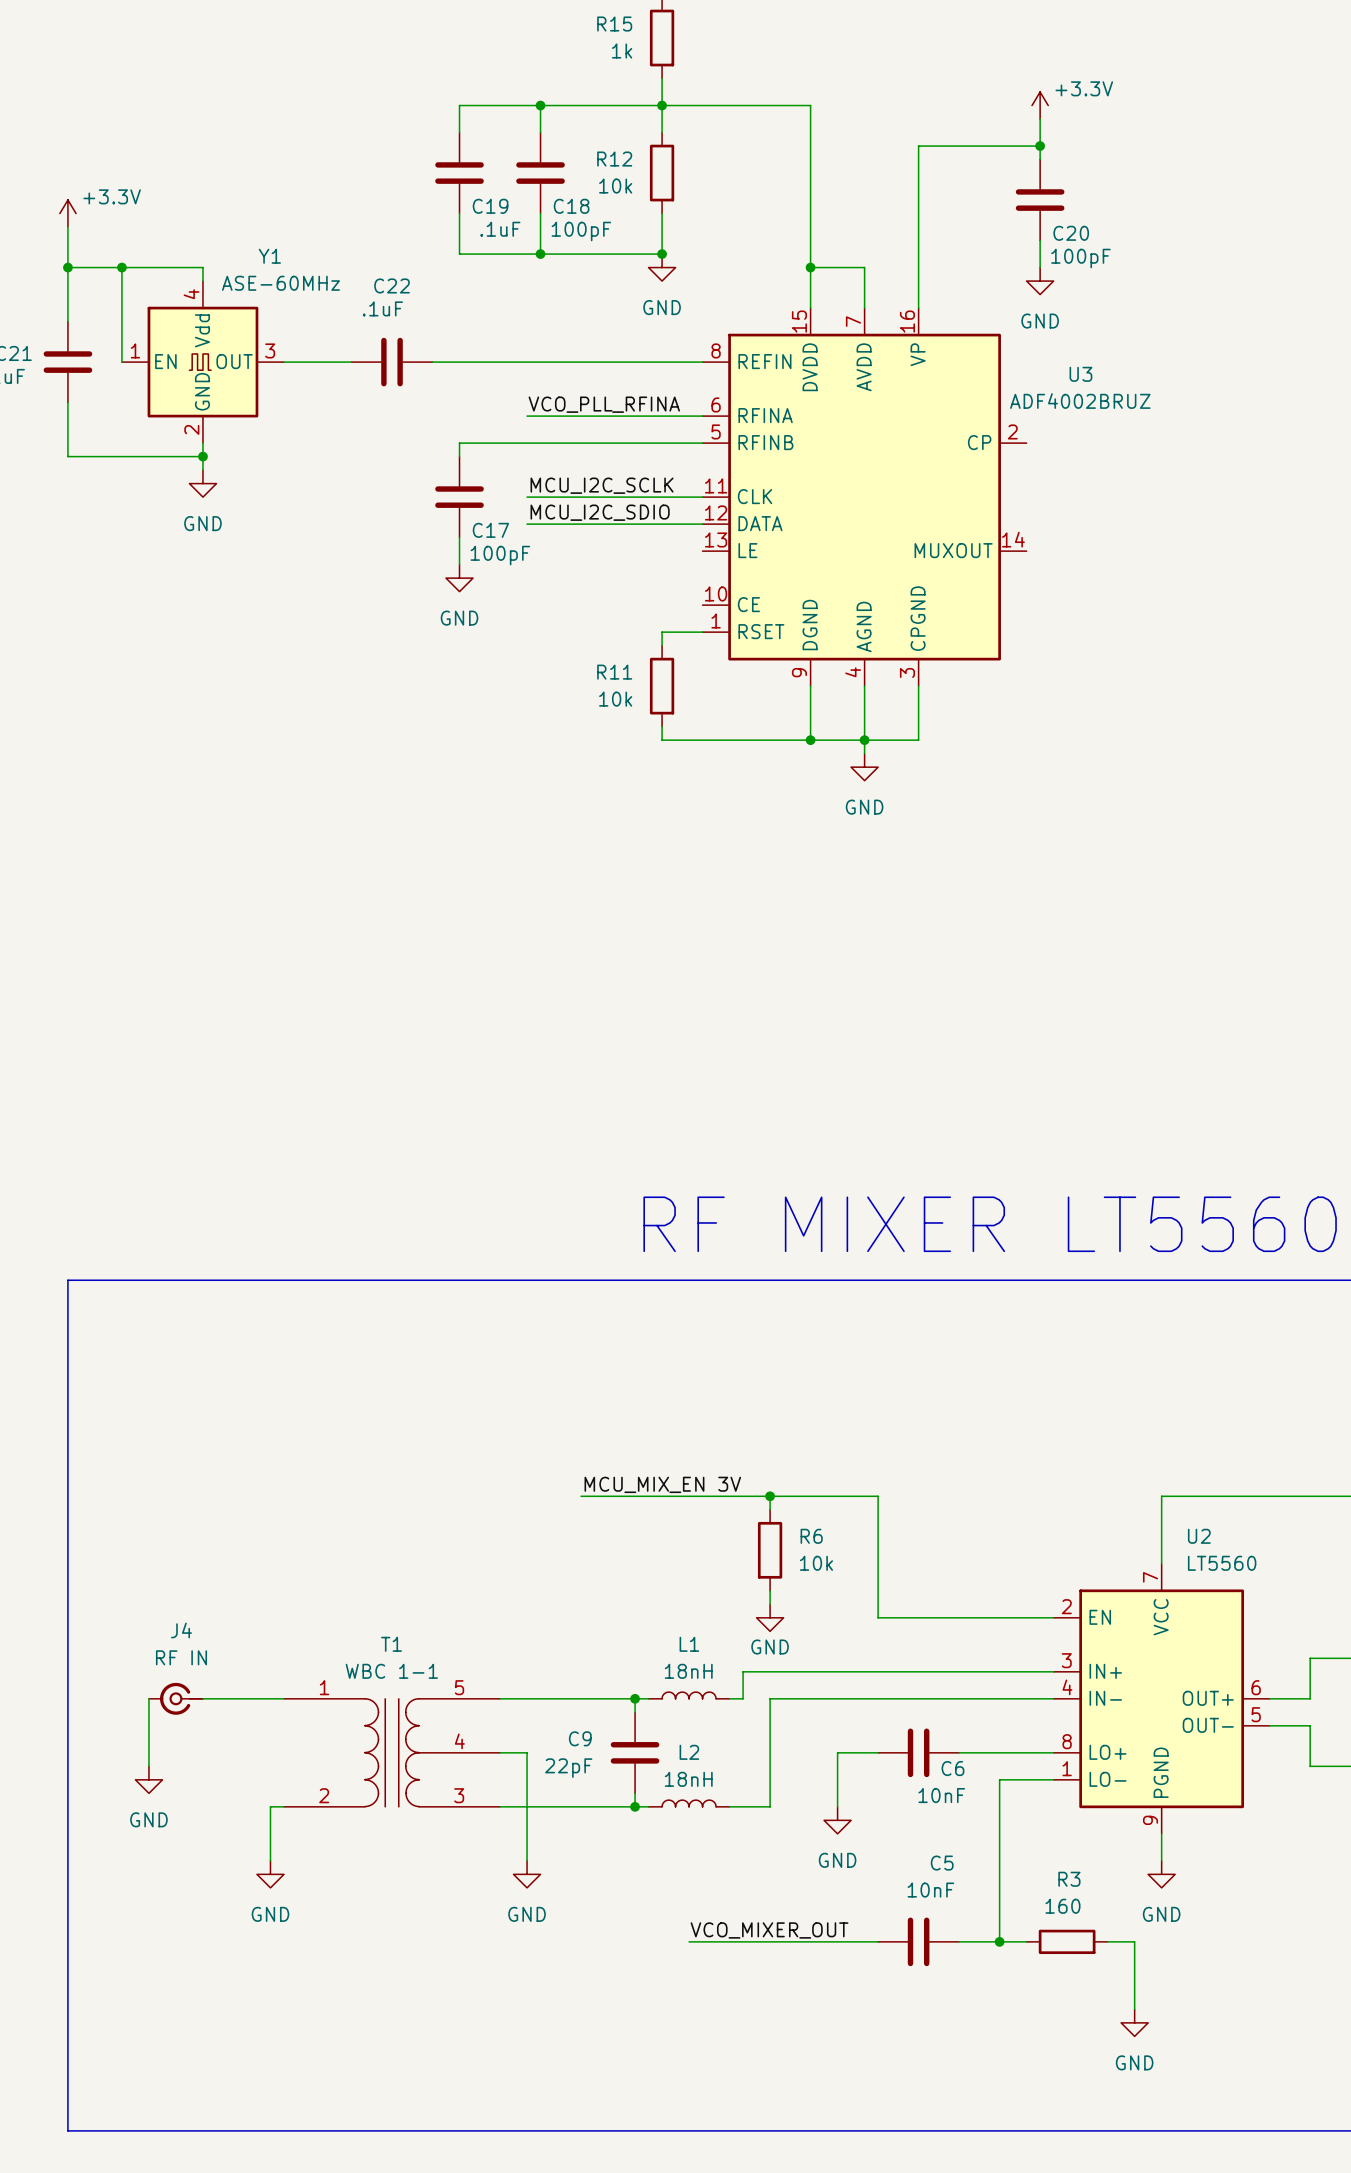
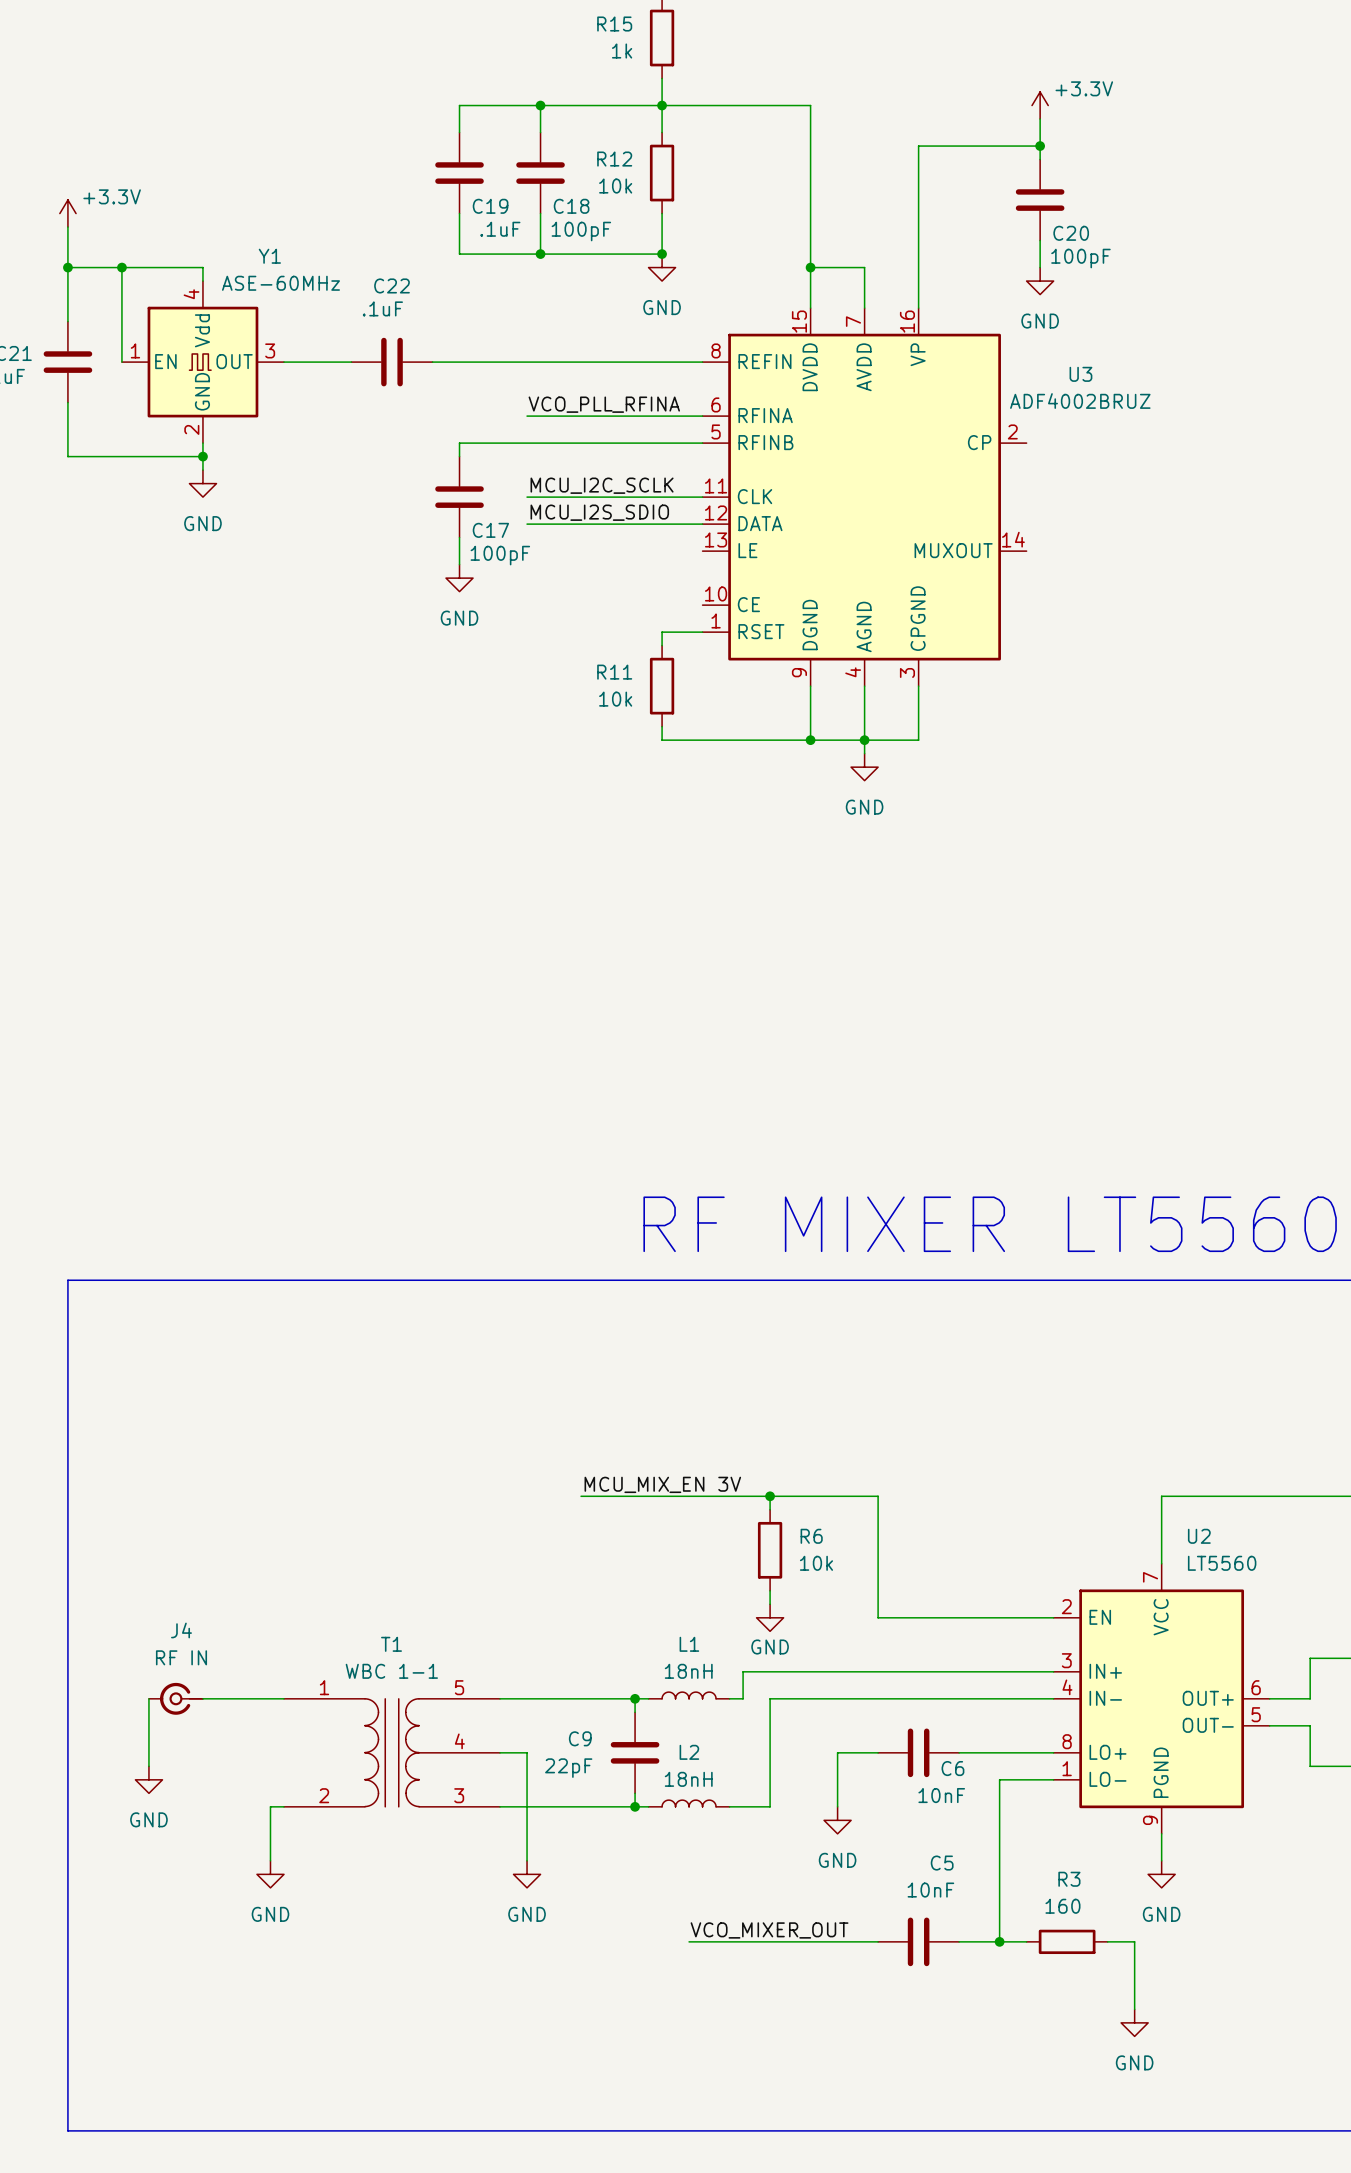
label: MCU_I2C_SDIO (600, 512) -> MCU_I2S_SDIO (599, 512)

